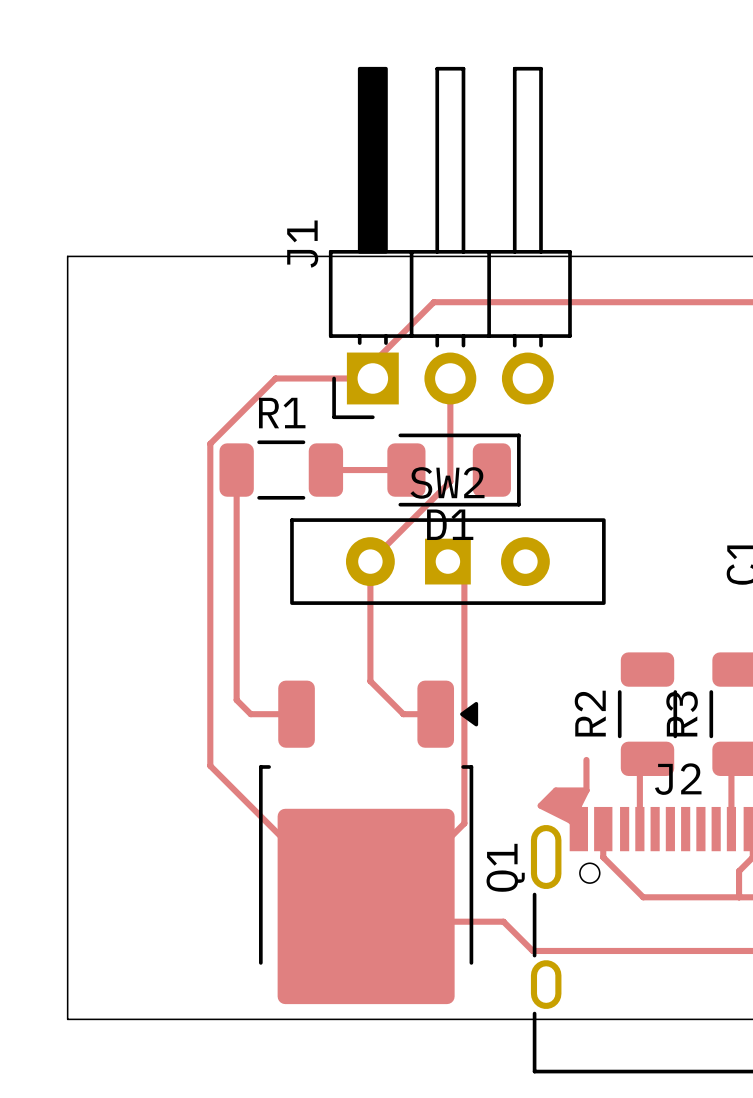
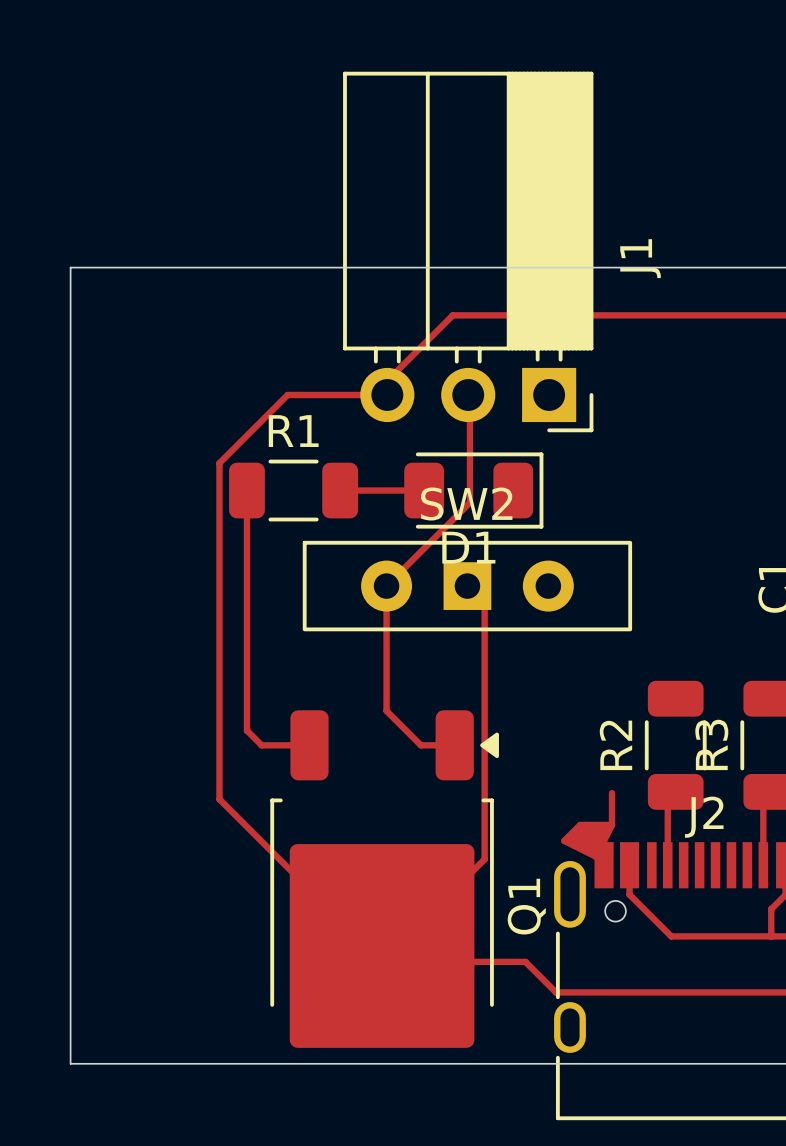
J1 footprint: [328, 66, 572, 420] -> [343, 71, 594, 433]
J1 name position: J1 (302, 244) -> J1 (640, 258)

